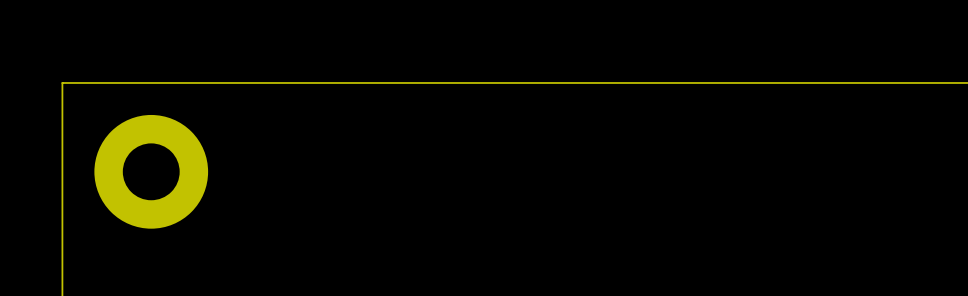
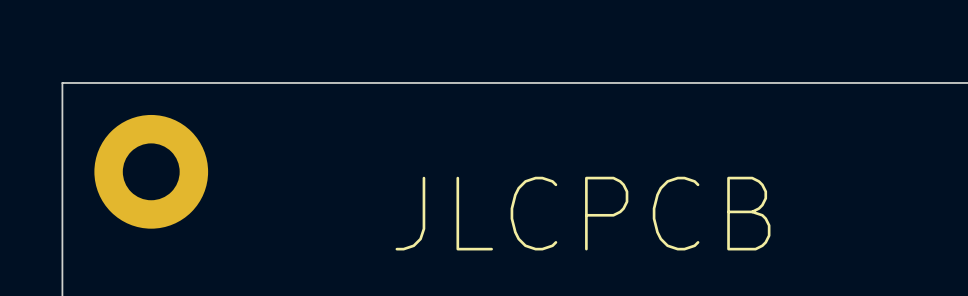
text: none -> JLCPCB (583, 213)

